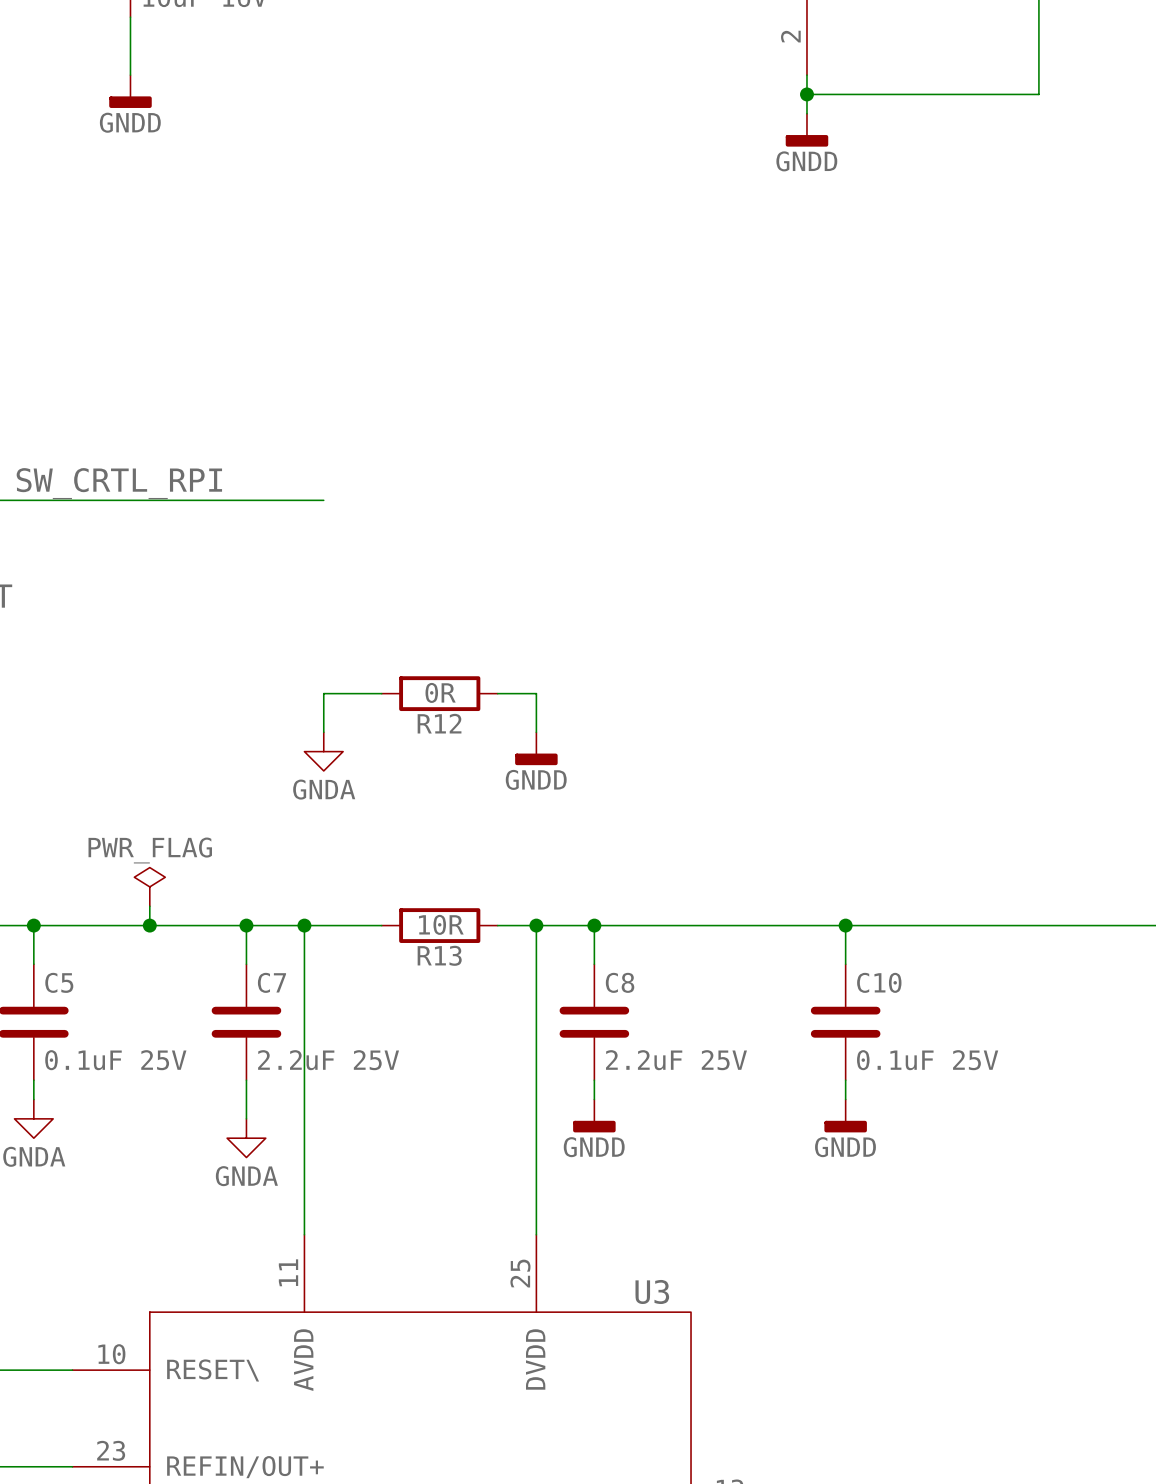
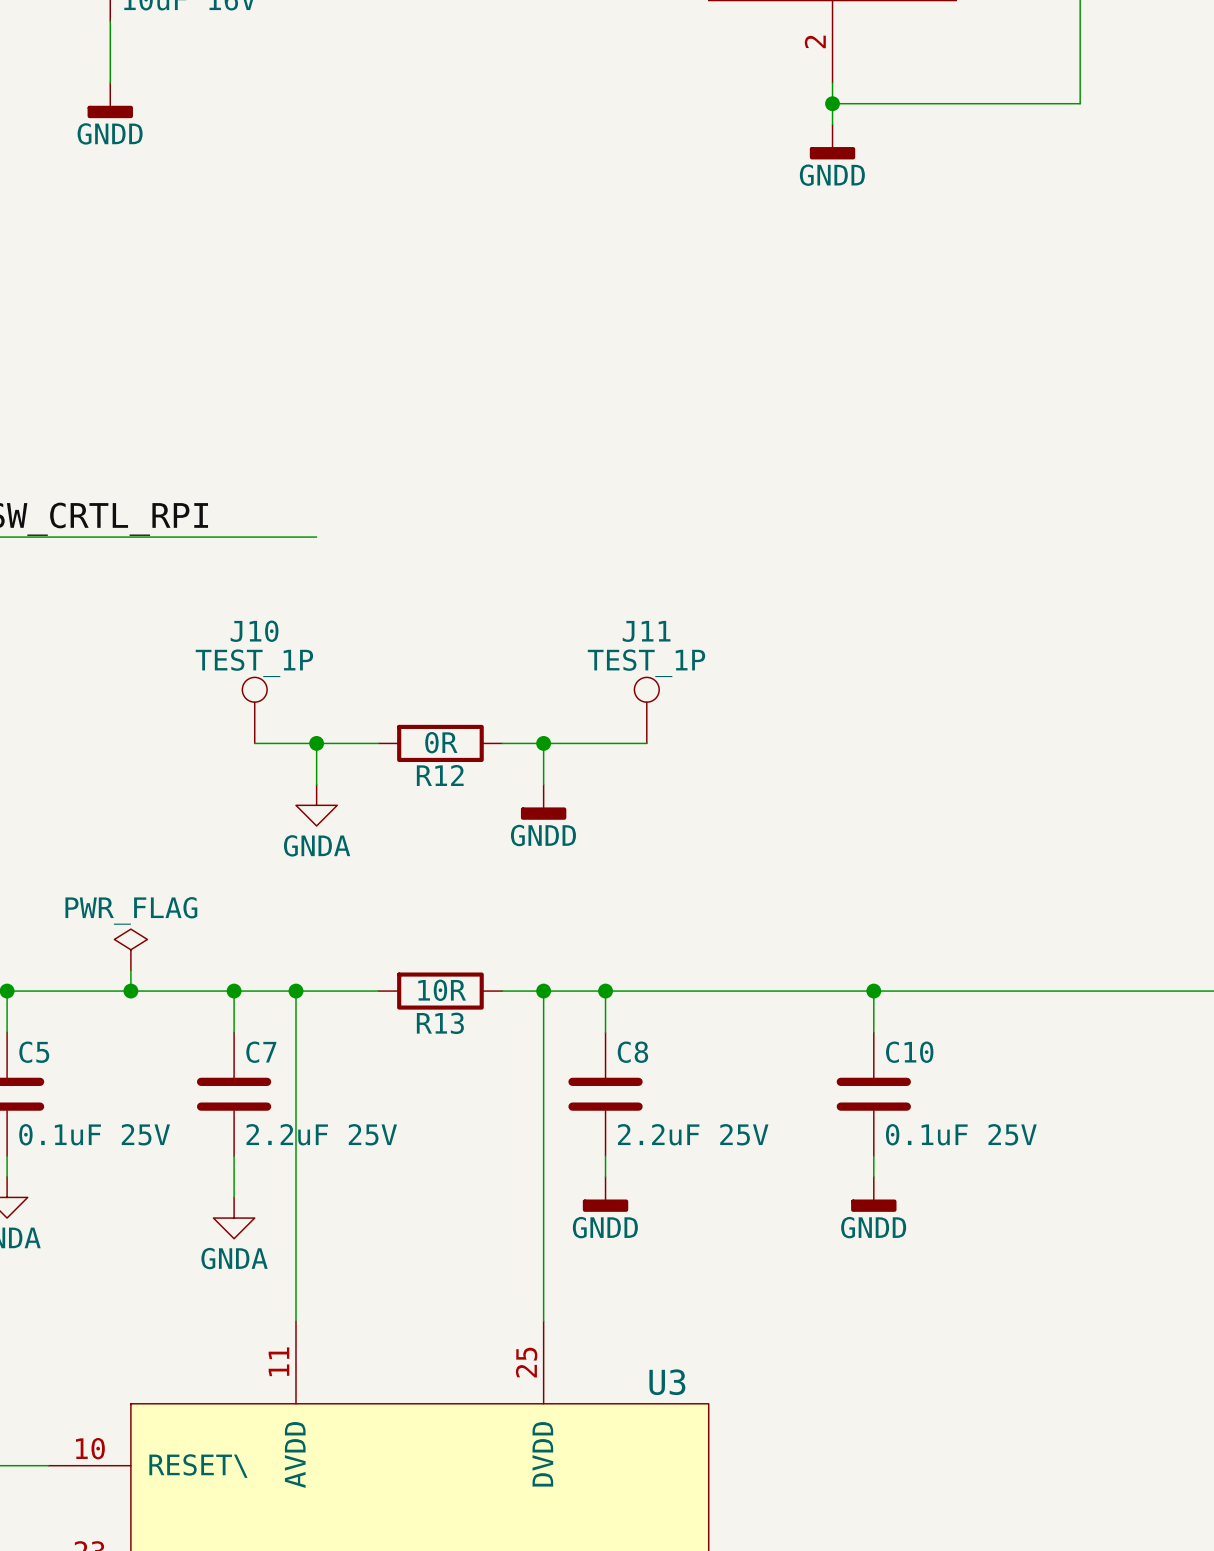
J10: none -> TEST_1P (254, 710)
J11: none -> TEST_1P (646, 710)
wire: none -> (254, 743) (316, 743)
junction: none -> (316, 743)
wire: none -> (543, 743) (646, 743)
junction: none -> (543, 743)

